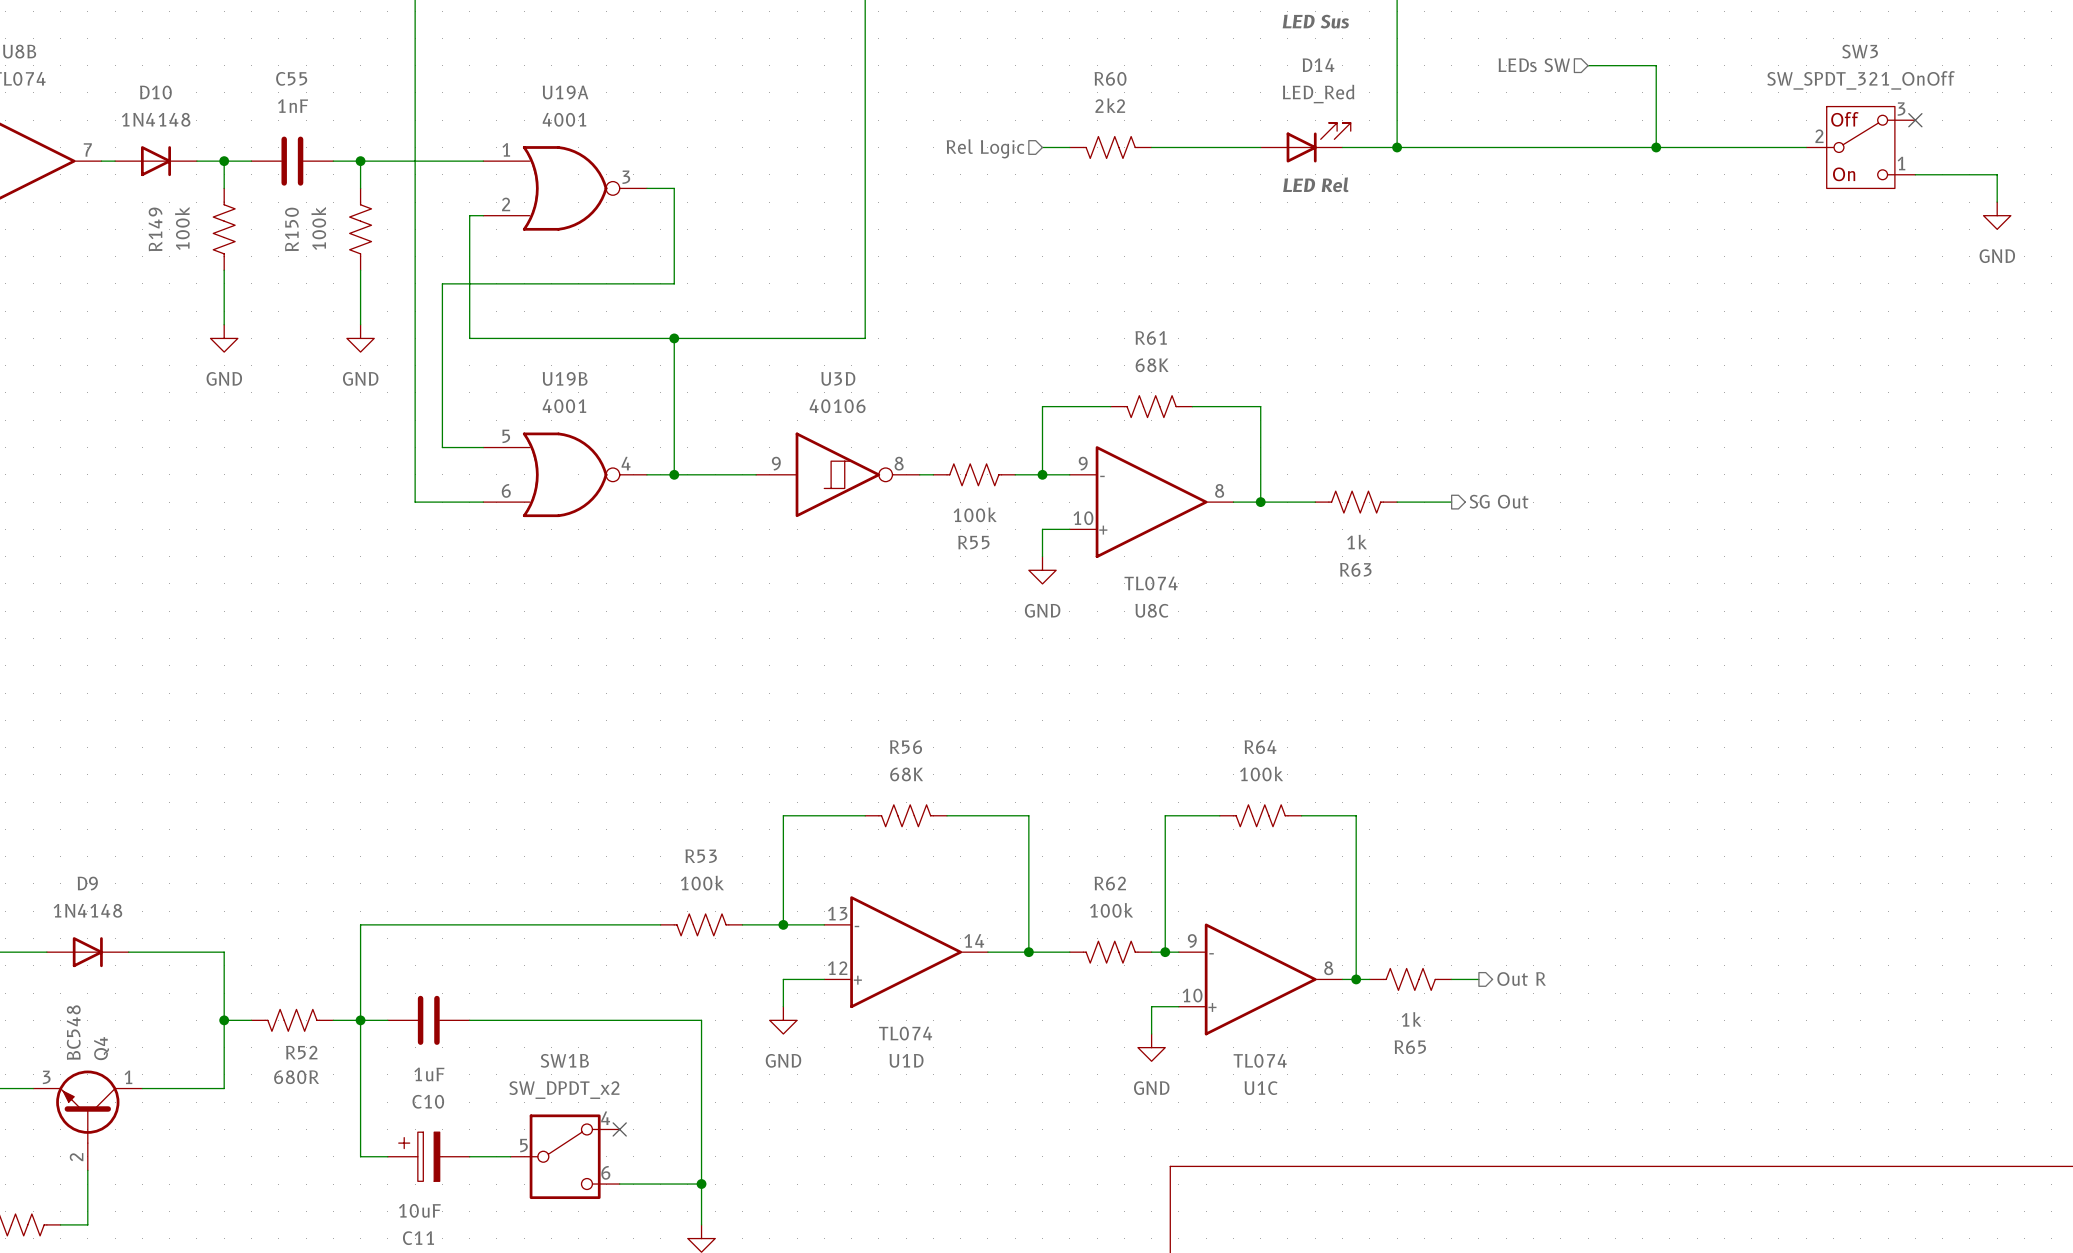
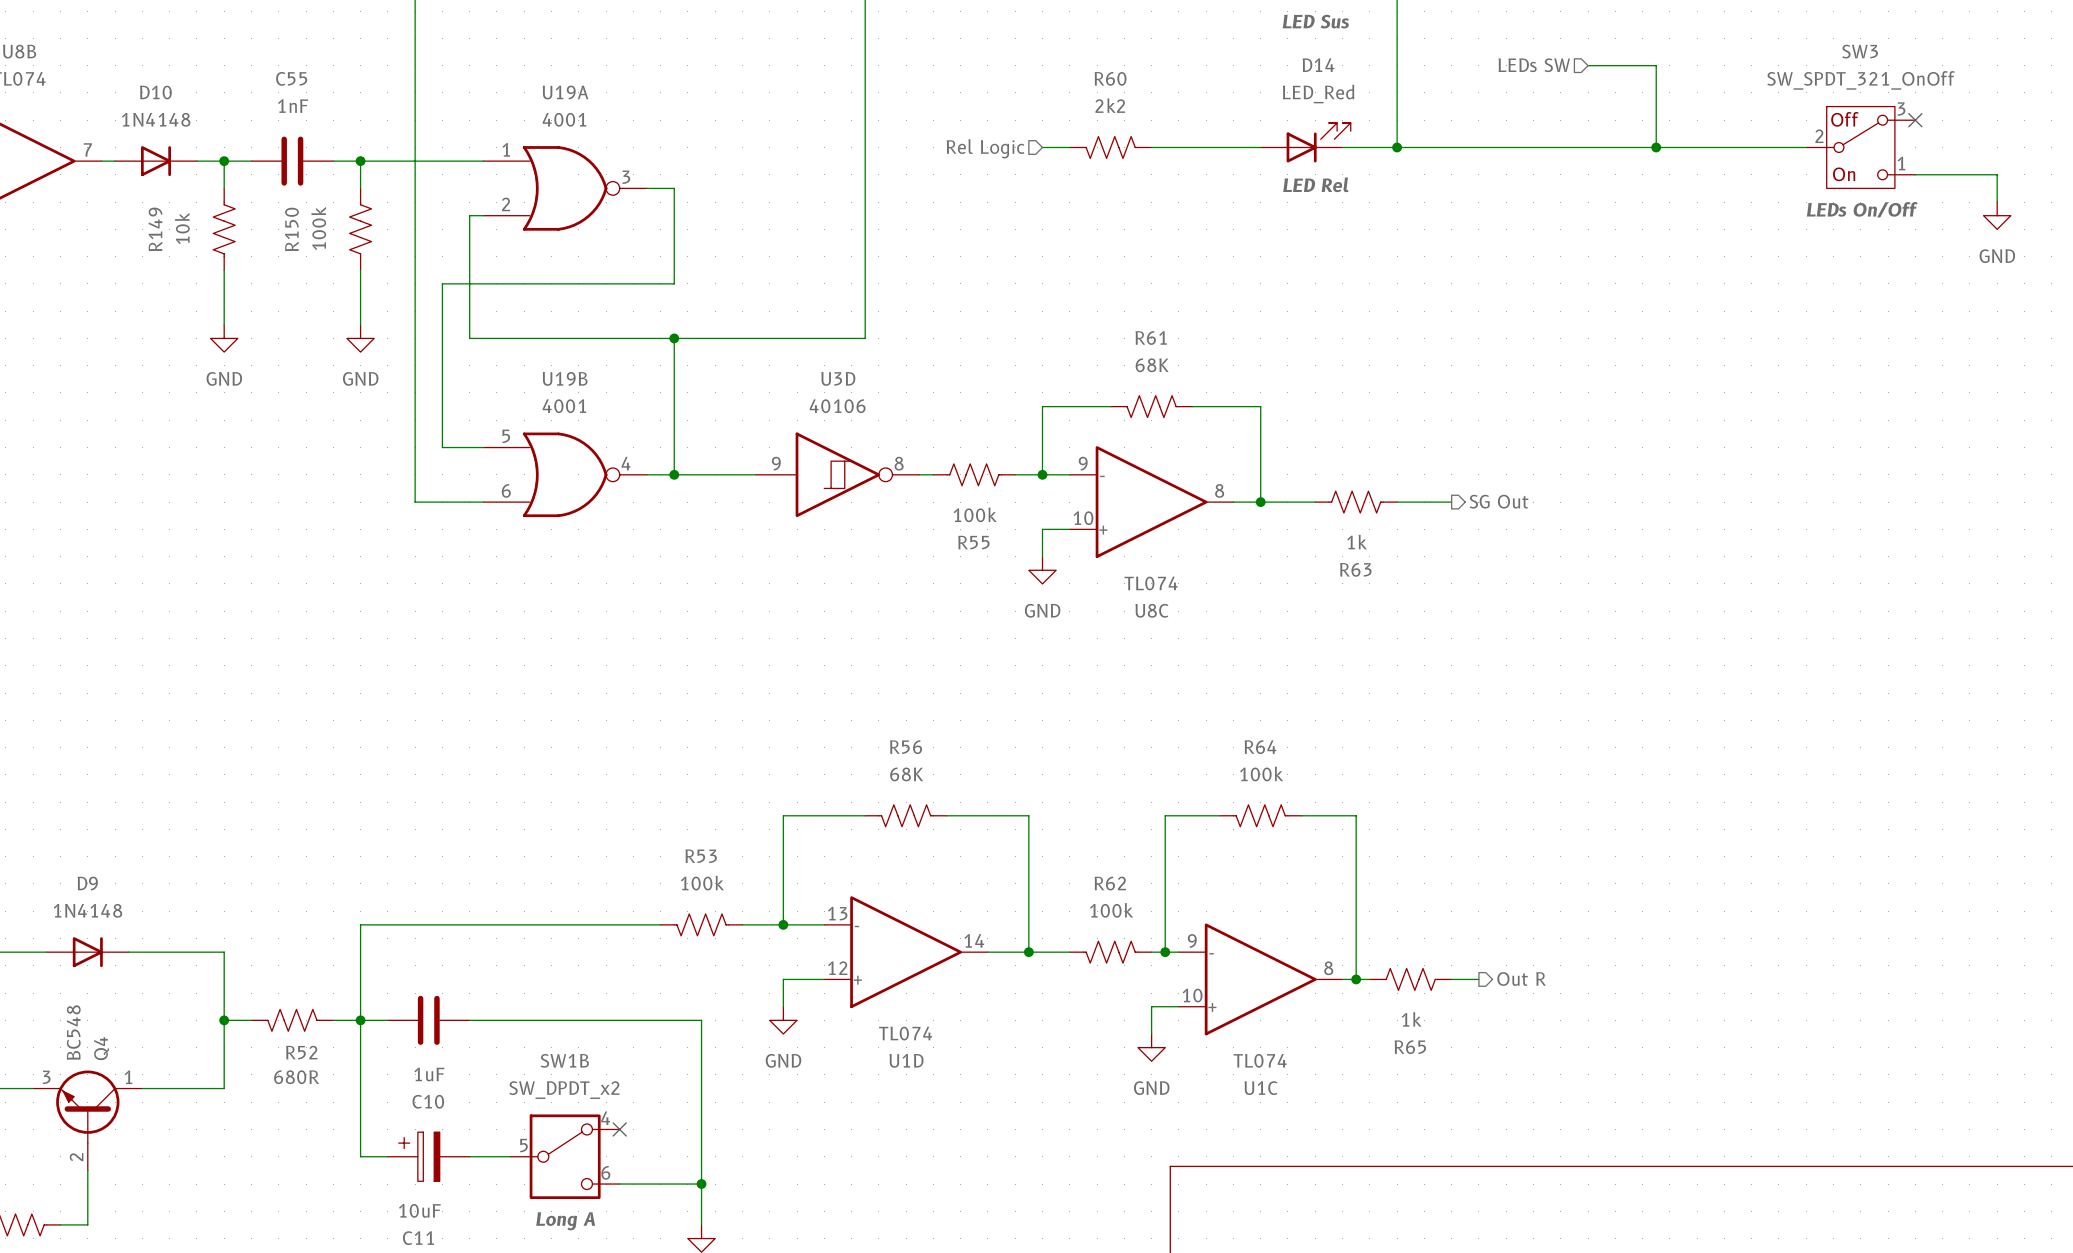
SW3 text: none -> LEDs On/Off (1862, 209)
R149 value: 100k (182, 228) -> 10k (182, 228)
SW1B text: none -> Long A (565, 1221)

